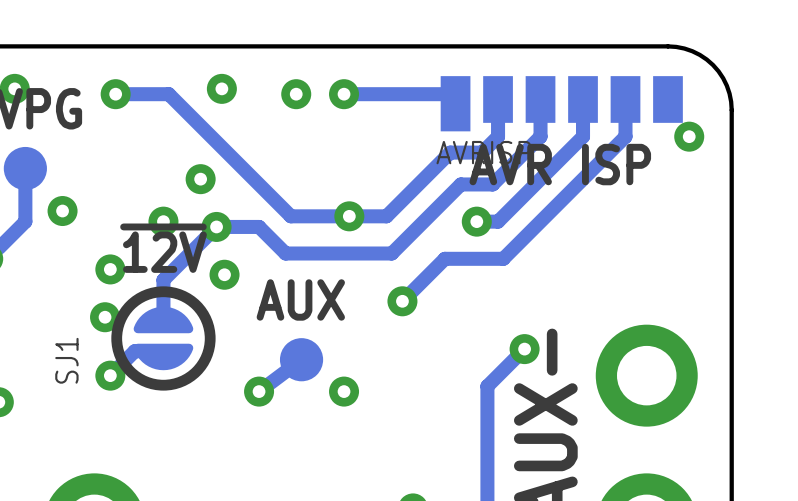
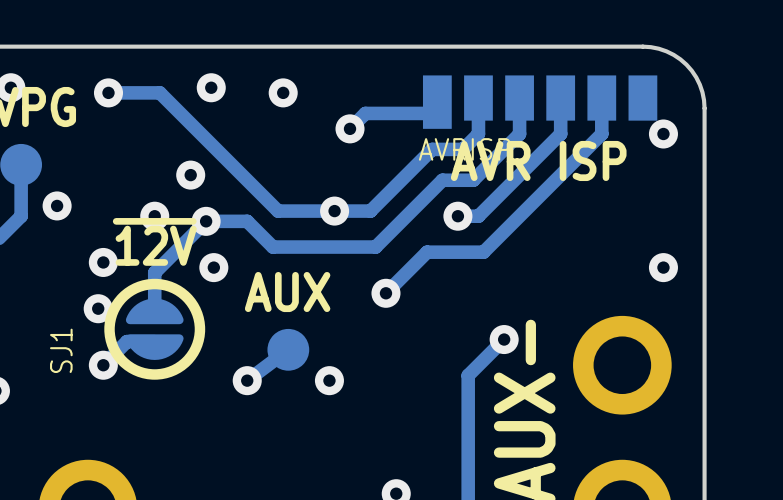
track: (344, 94) (443, 94) (455, 103) -> (350, 128) (365, 113) (431, 113) (437, 102)
via position: (344, 94) -> (350, 128)
via: none -> (663, 267)

